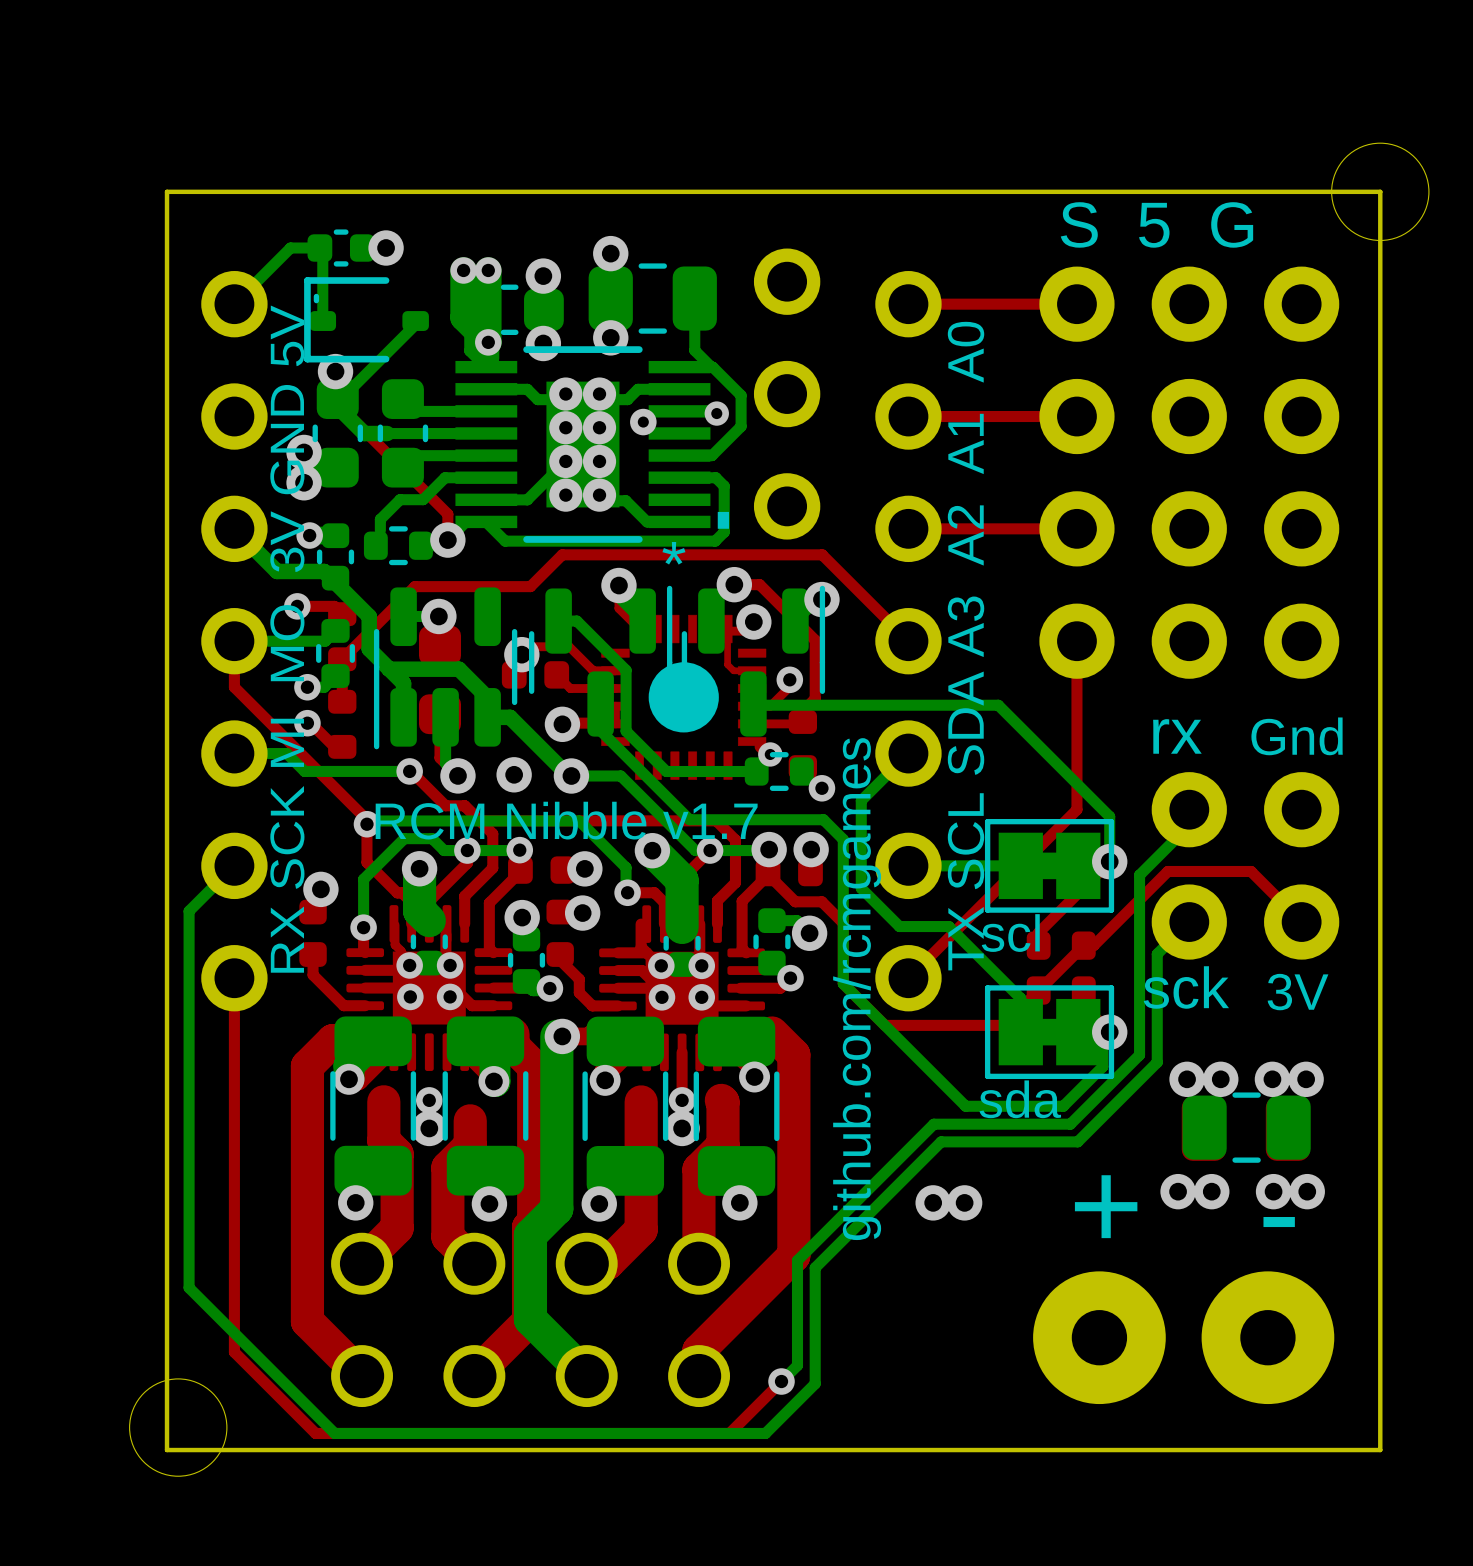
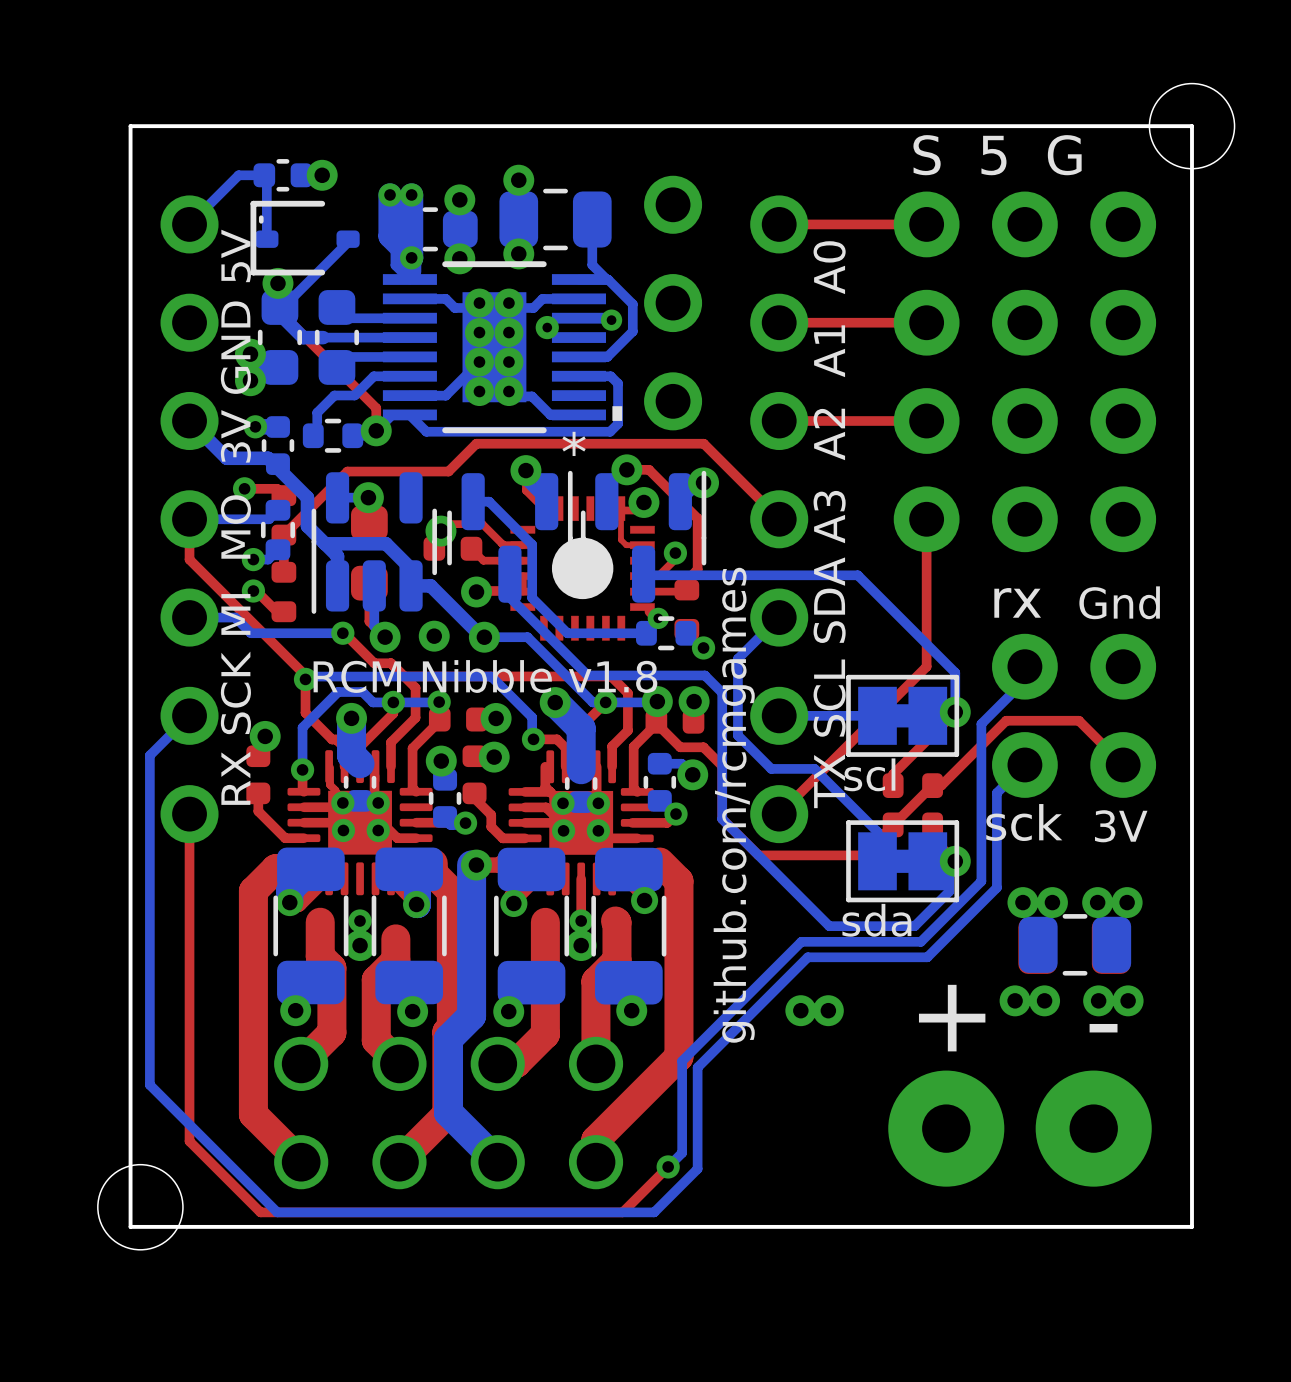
text: RCM Nibble v1.7 (566, 820) -> RCM Nibble v1.8 (485, 676)

